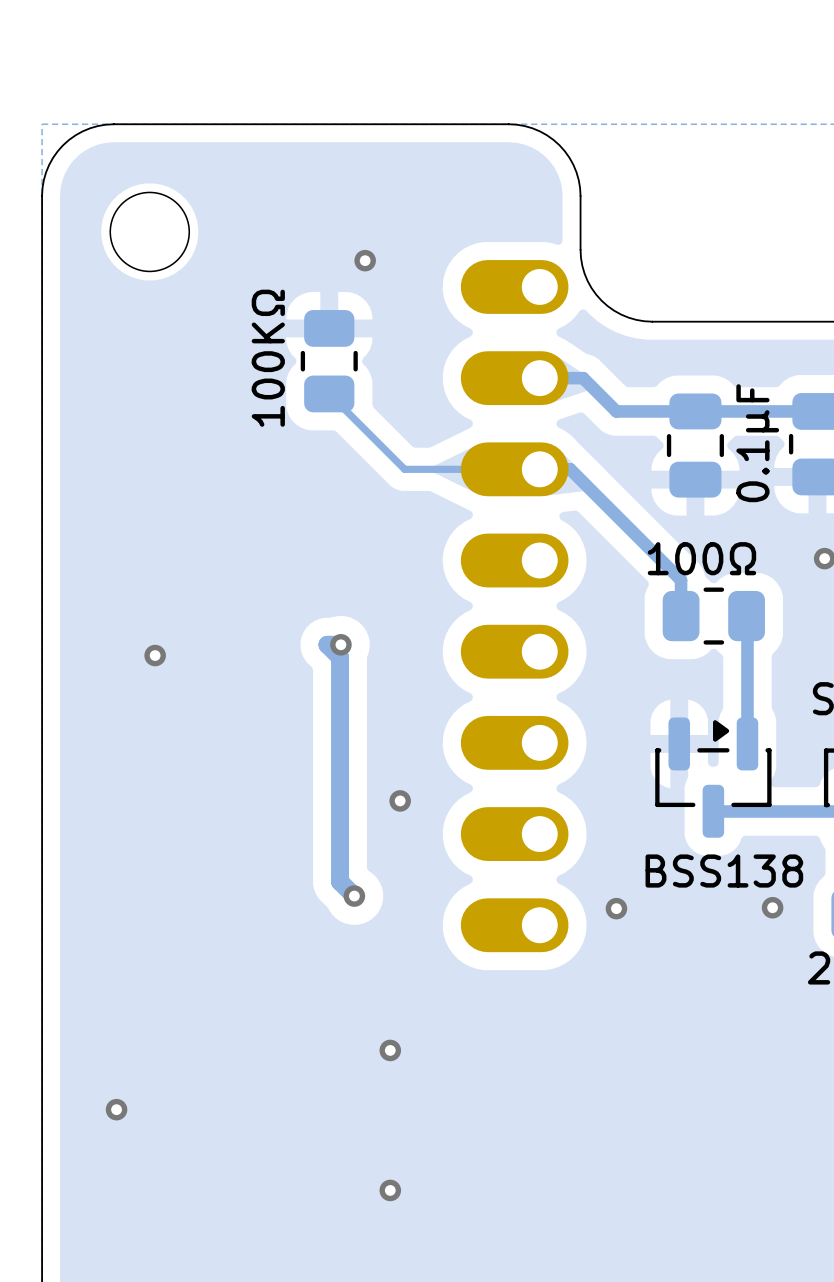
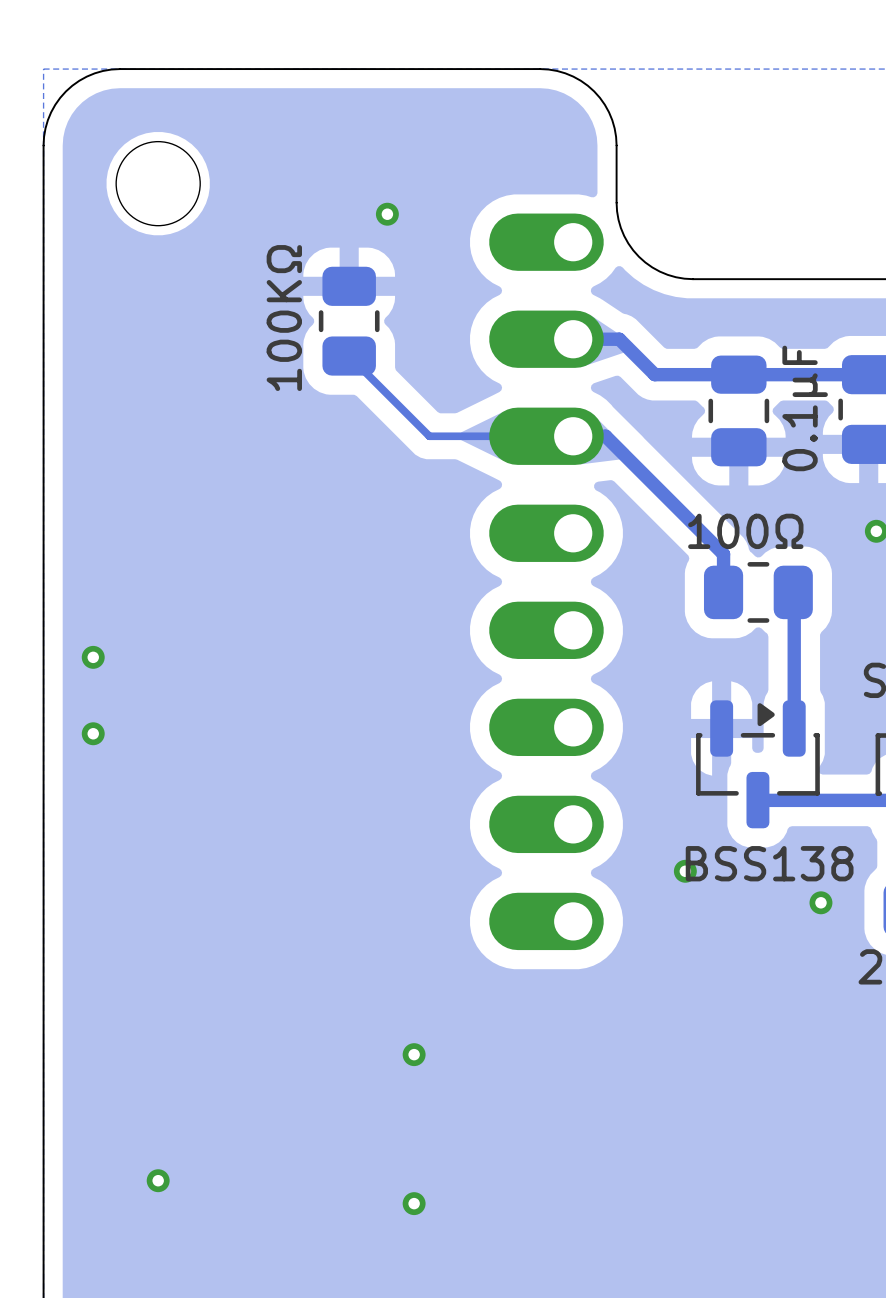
track: (340, 644) (327, 644) (340, 657) (340, 881) (354, 896) -> none
via: (340, 644) -> none
via: (155, 655) -> none
via: none -> (93, 657)
via: none -> (93, 733)
via: (400, 800) -> none
via: (354, 896) -> none
via position: (616, 908) -> (685, 871)
via position: (116, 1109) -> (158, 1180)

